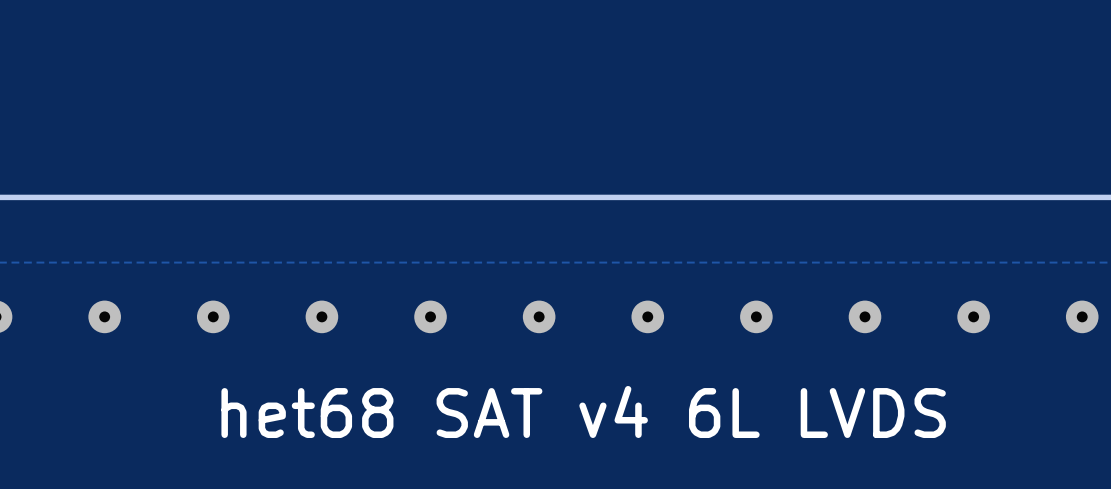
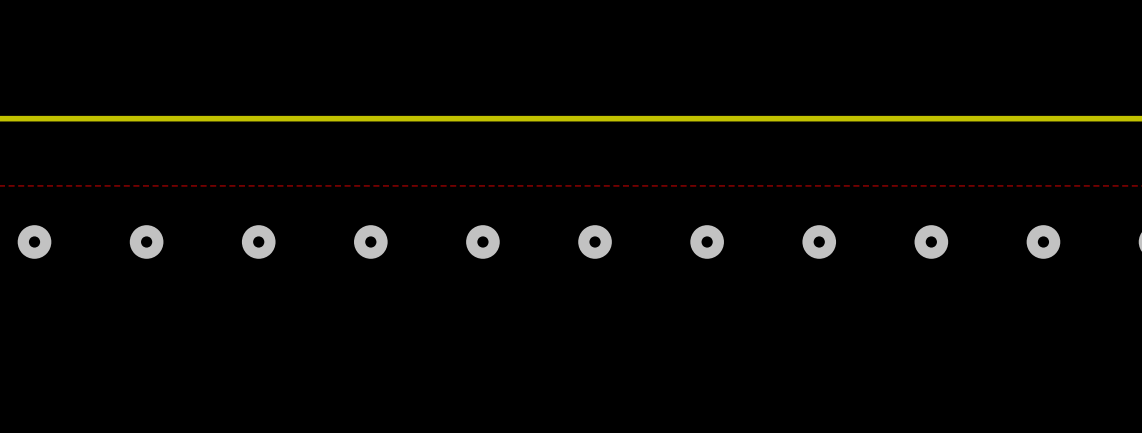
text: het68 SAT v4 6L LVDS (583, 411) -> none

